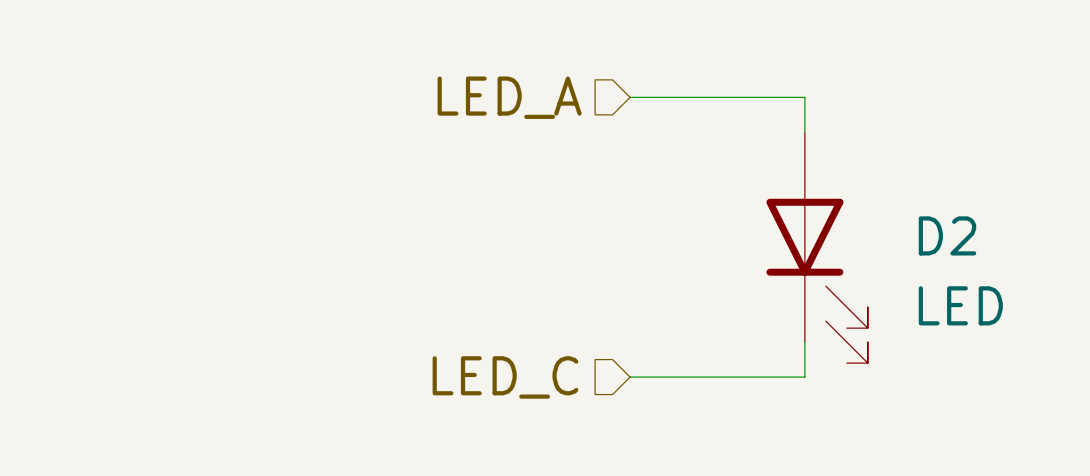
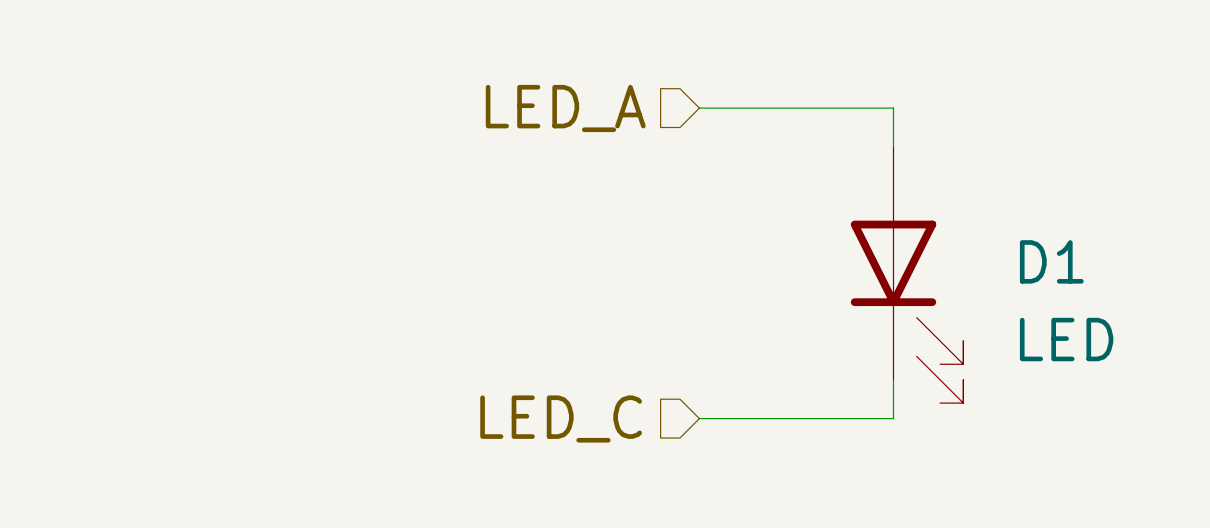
D2 name: D2 (947, 235) -> D1 (1051, 261)

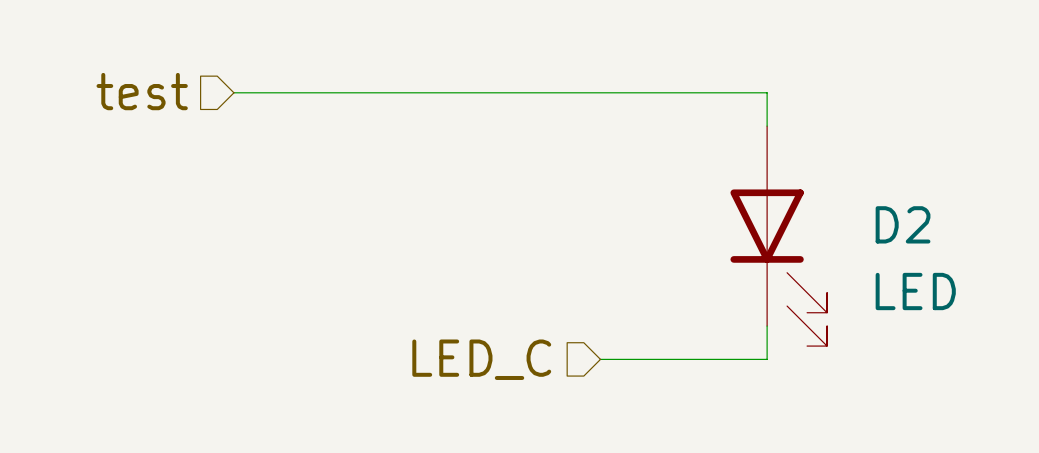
hierarchical label: none -> test (142, 91)
wire: none -> (233, 92) (600, 92)
hierarchical label: LED_A (565, 108) -> none
D1 name: D1 (1051, 261) -> D2 (903, 224)

